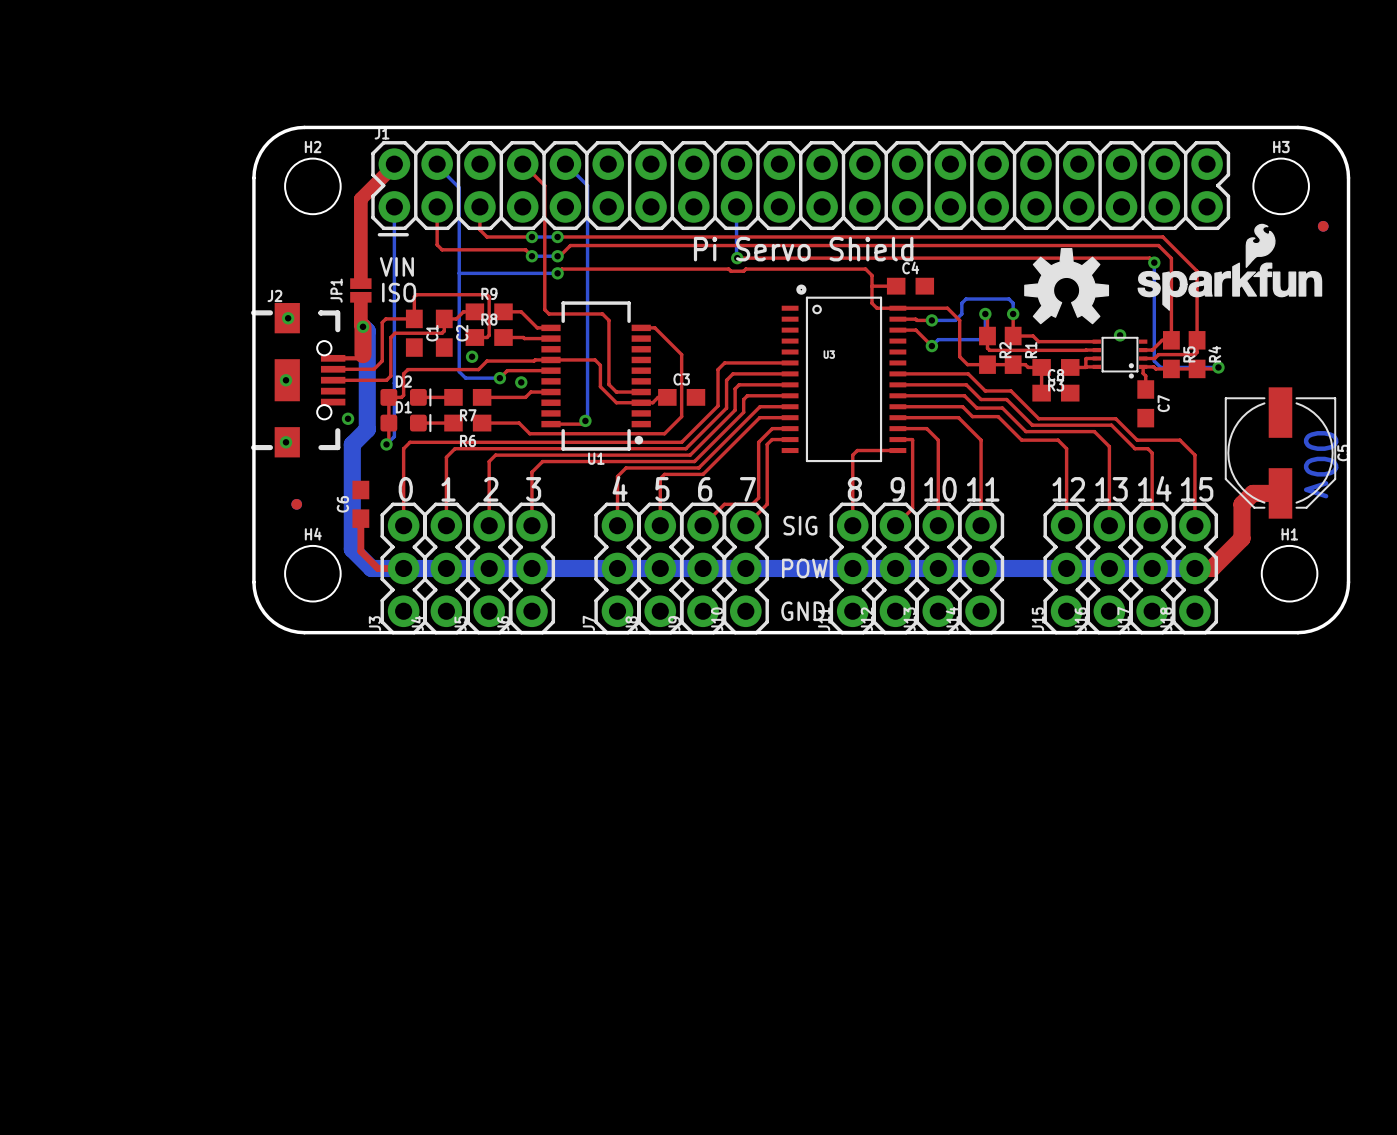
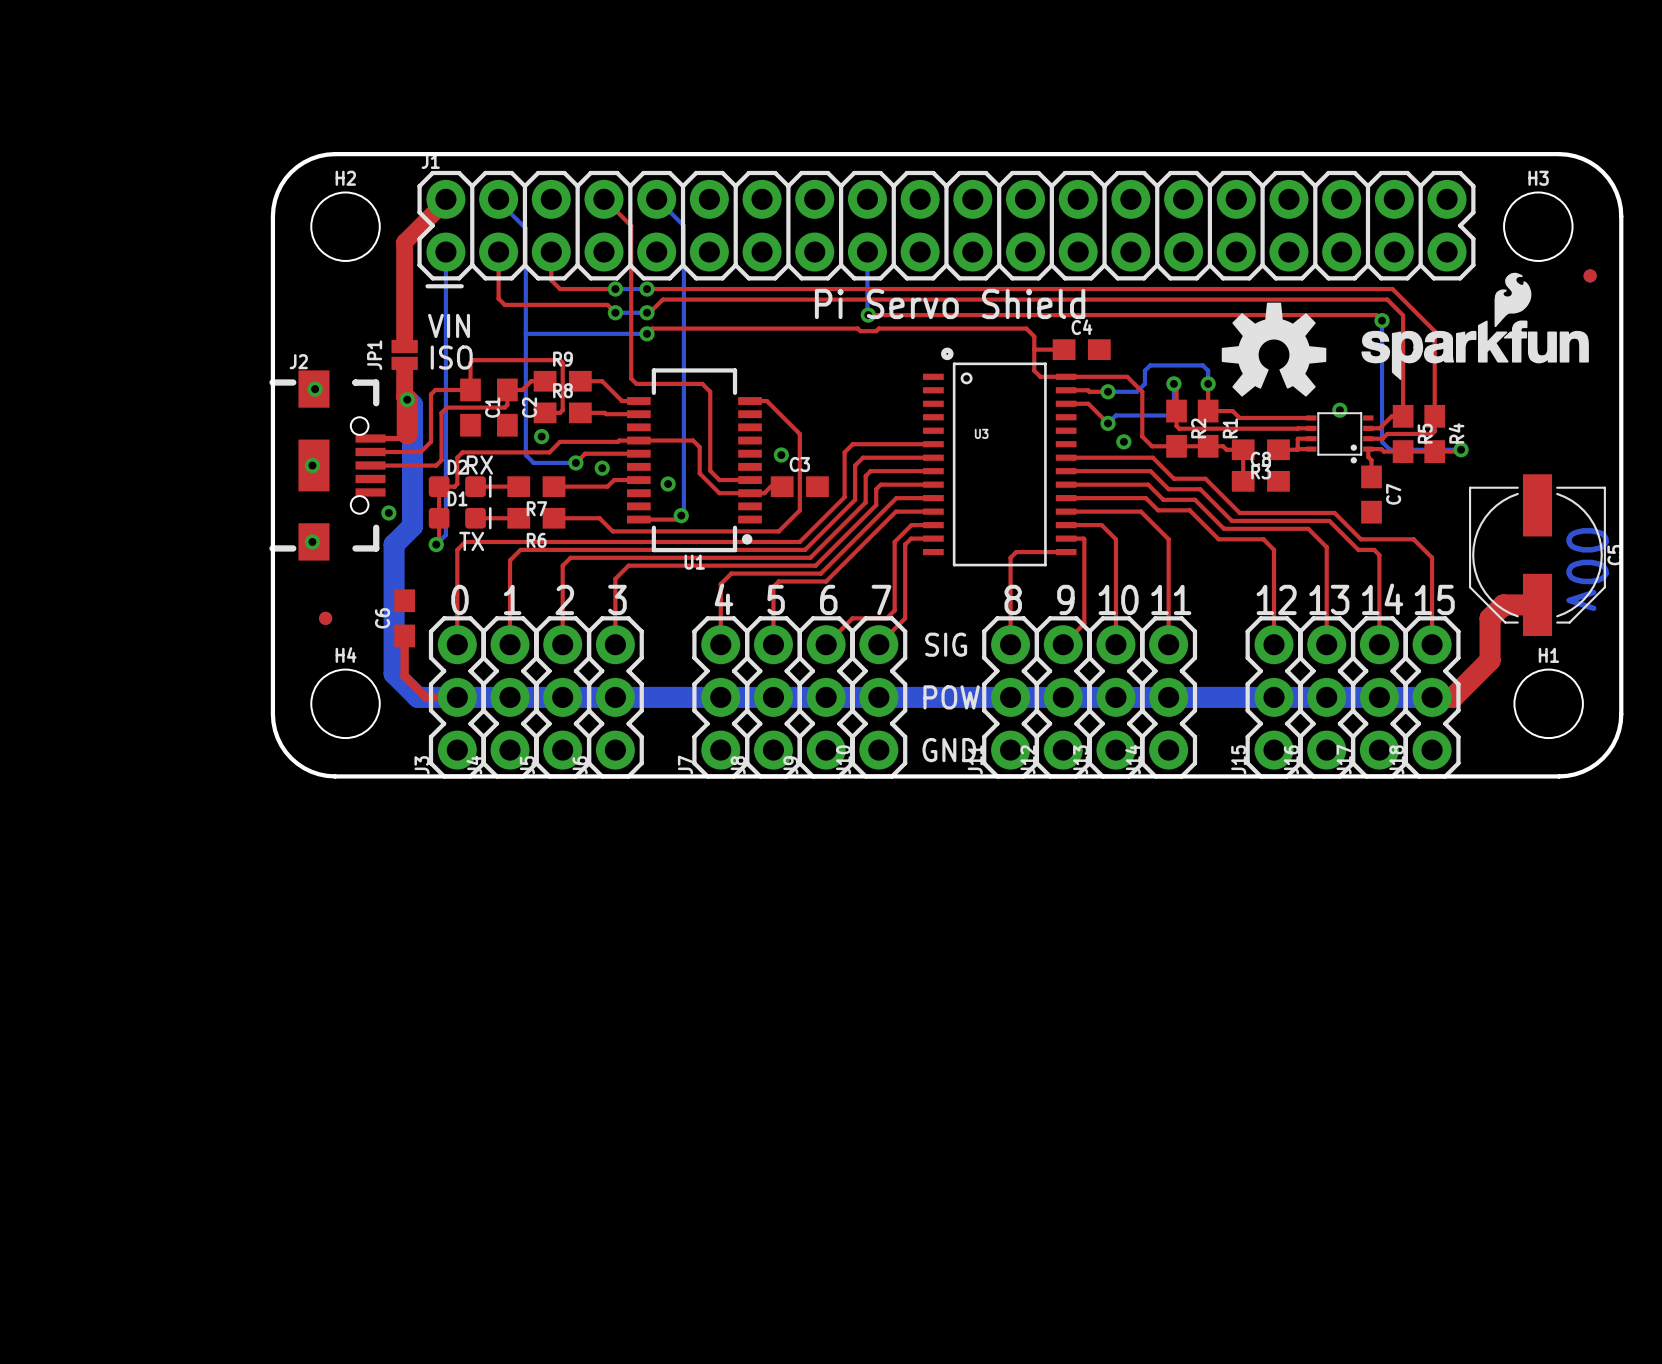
via: none -> (1123, 441)
via: none -> (781, 455)
text: none -> RX (479, 465)
via: none -> (668, 484)
text: none -> TX (471, 541)

